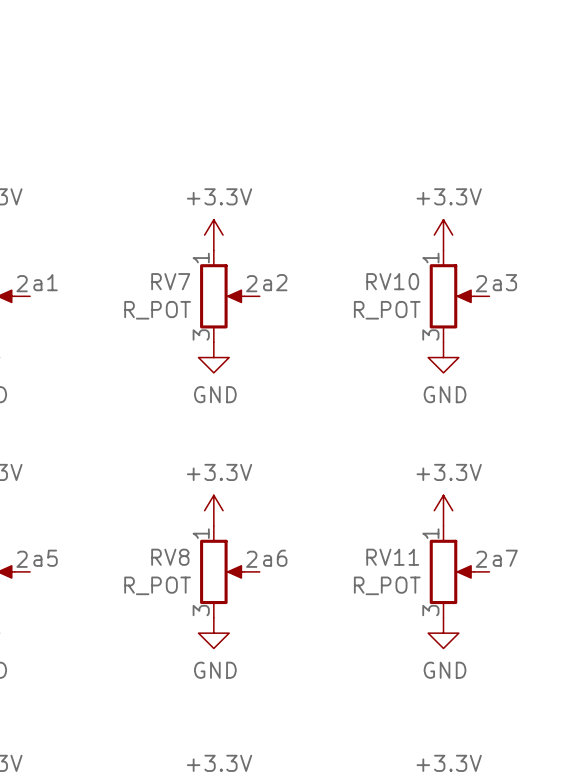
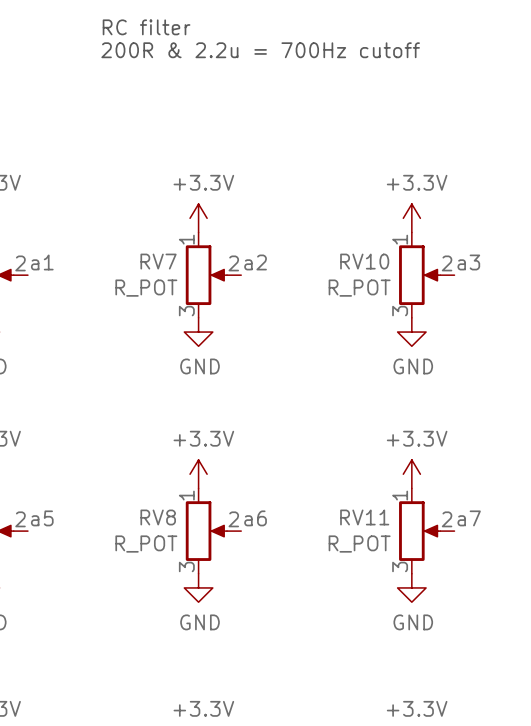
text: none -> RC filter (146, 27)
text: none -> 200R & 2.2u = 700Hz cutoff (260, 50)

